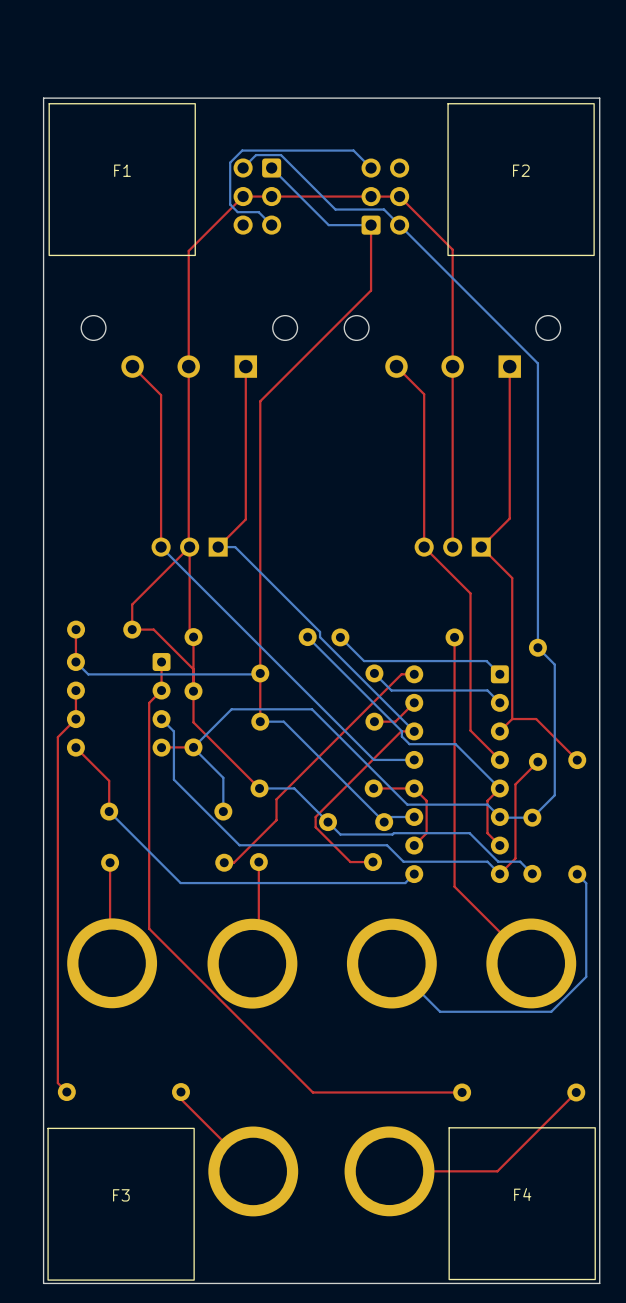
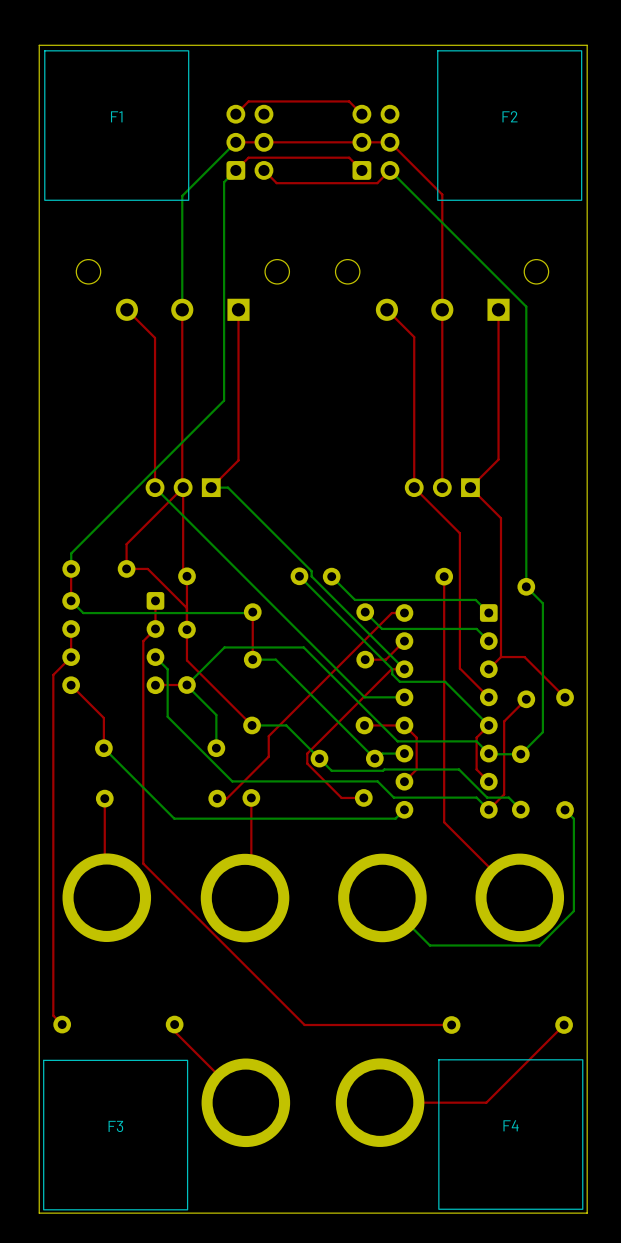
bottom track: (243, 168) (256, 155) (281, 155) (335, 209) (384, 209) (399, 225) -> none
bottom track: (271, 168) (328, 225) (371, 225) -> none
top track: none -> (361, 114) (349, 101) (248, 101) (235, 114)
bottom track: (371, 168) (353, 150) (242, 150) (230, 162) (230, 204) (237, 212) (258, 212) (271, 225) -> none
top track: (243, 196) (188, 250) (188, 366) -> none
bottom track: none -> (235, 142) (182, 195) (182, 309)
part rotation: 0° (257, 196) -> 180° (249, 142)
bottom track: none -> (235, 170) (224, 182) (224, 400) (71, 553) (71, 568)
top track: (371, 225) (371, 290) (260, 401) (260, 673) -> (361, 170) (349, 157) (248, 157) (235, 170)
top track: none -> (390, 170) (377, 183) (276, 183) (263, 170)

